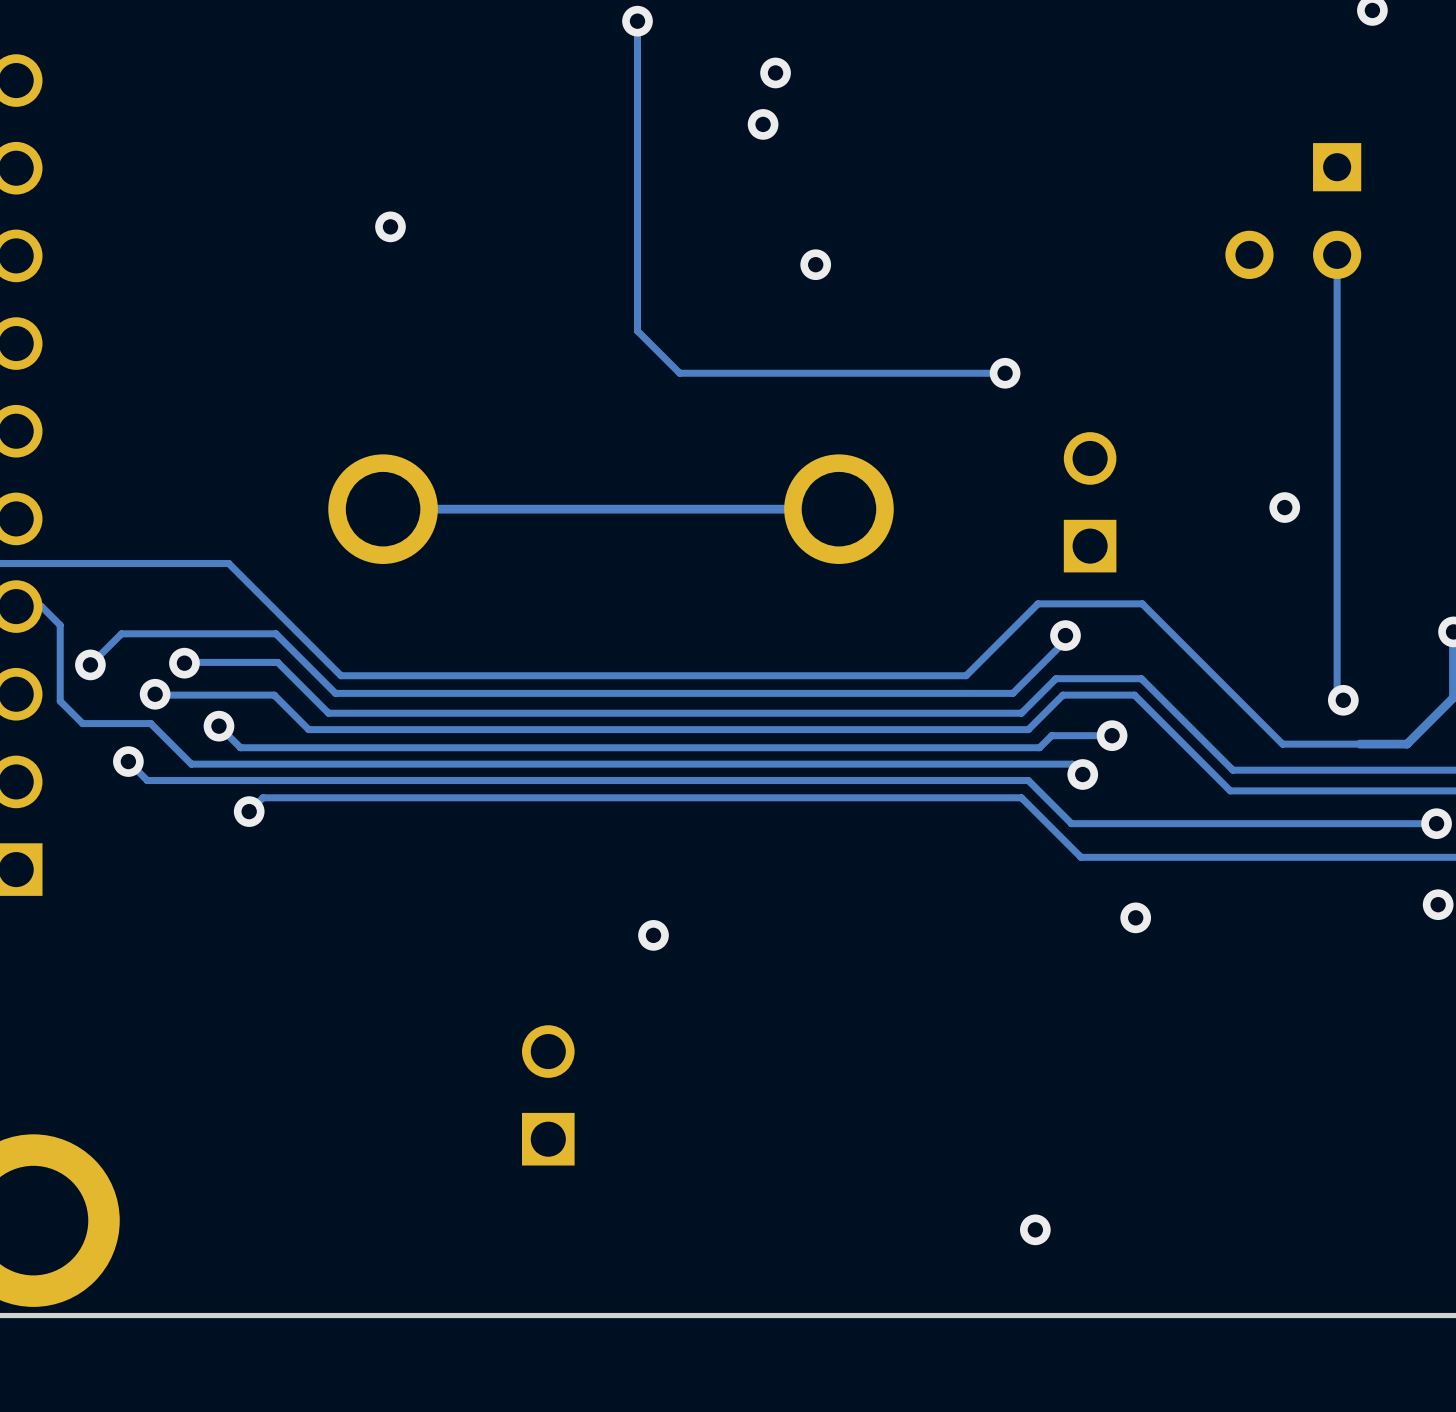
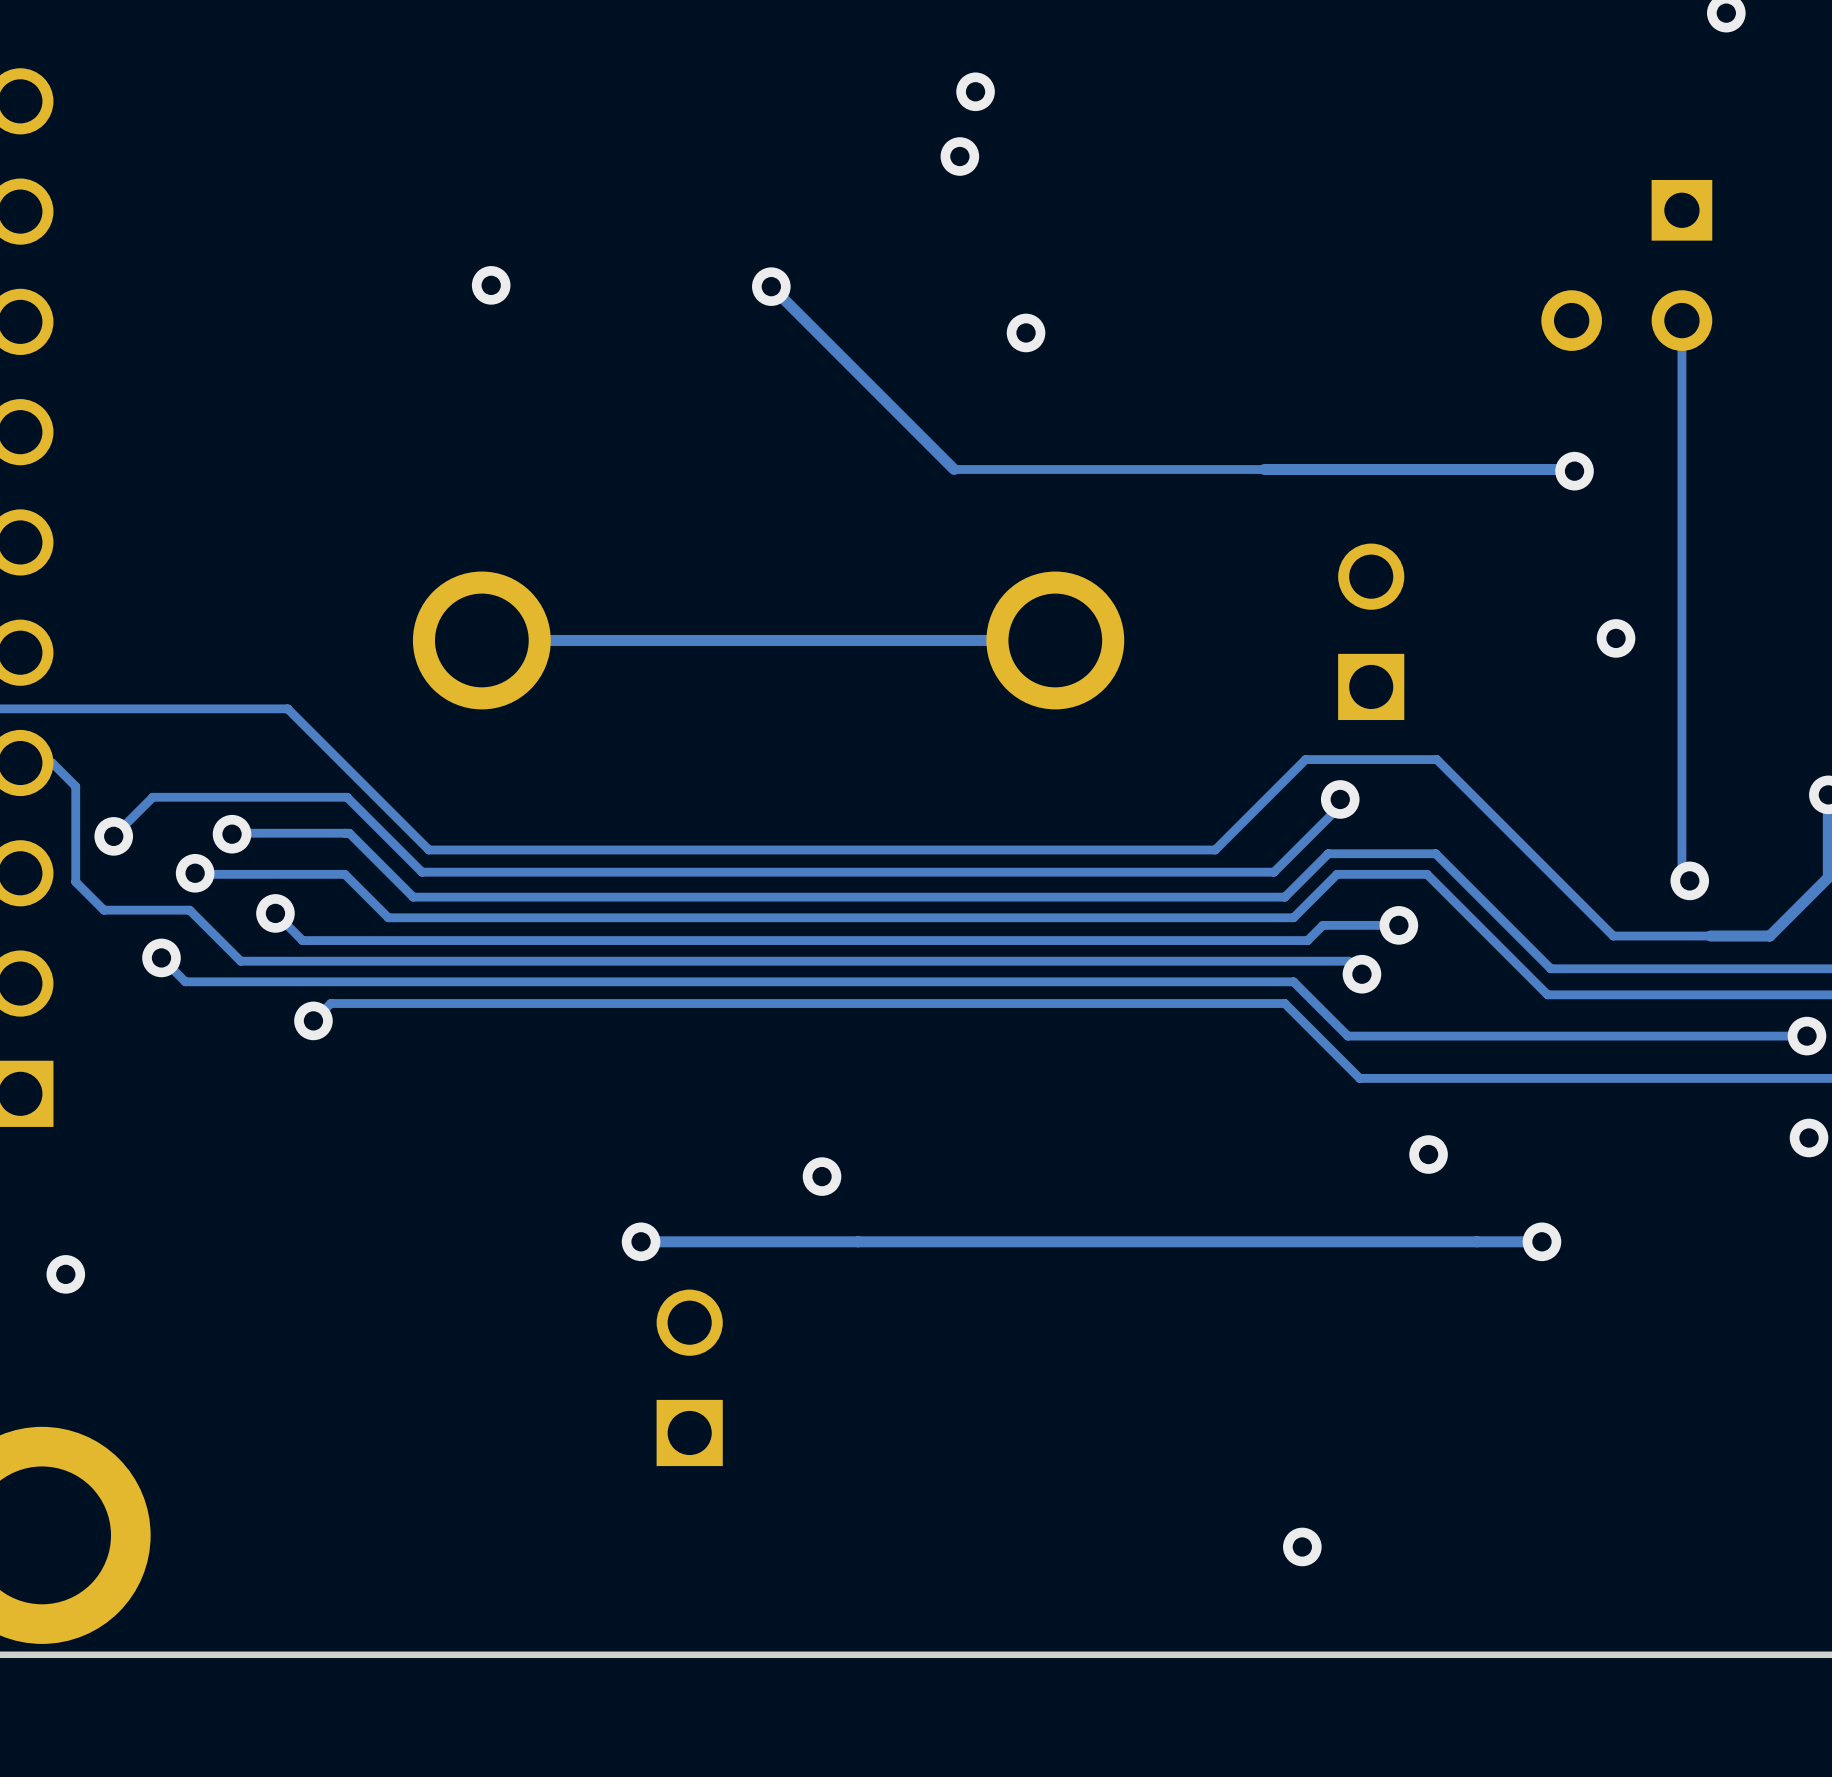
track: (637, 21) (637, 330) (679, 373) (758, 373) -> (771, 286) (954, 469)
via: (637, 21) -> none
via: none -> (771, 286)
track: none -> (1264, 469) (1572, 469) (1574, 471)
via: (1005, 373) -> none
via: none -> (1574, 471)
via: none -> (641, 1241)
track: none -> (1541, 1241) (641, 1241)
via: none -> (1541, 1241)
via: none -> (65, 1274)

